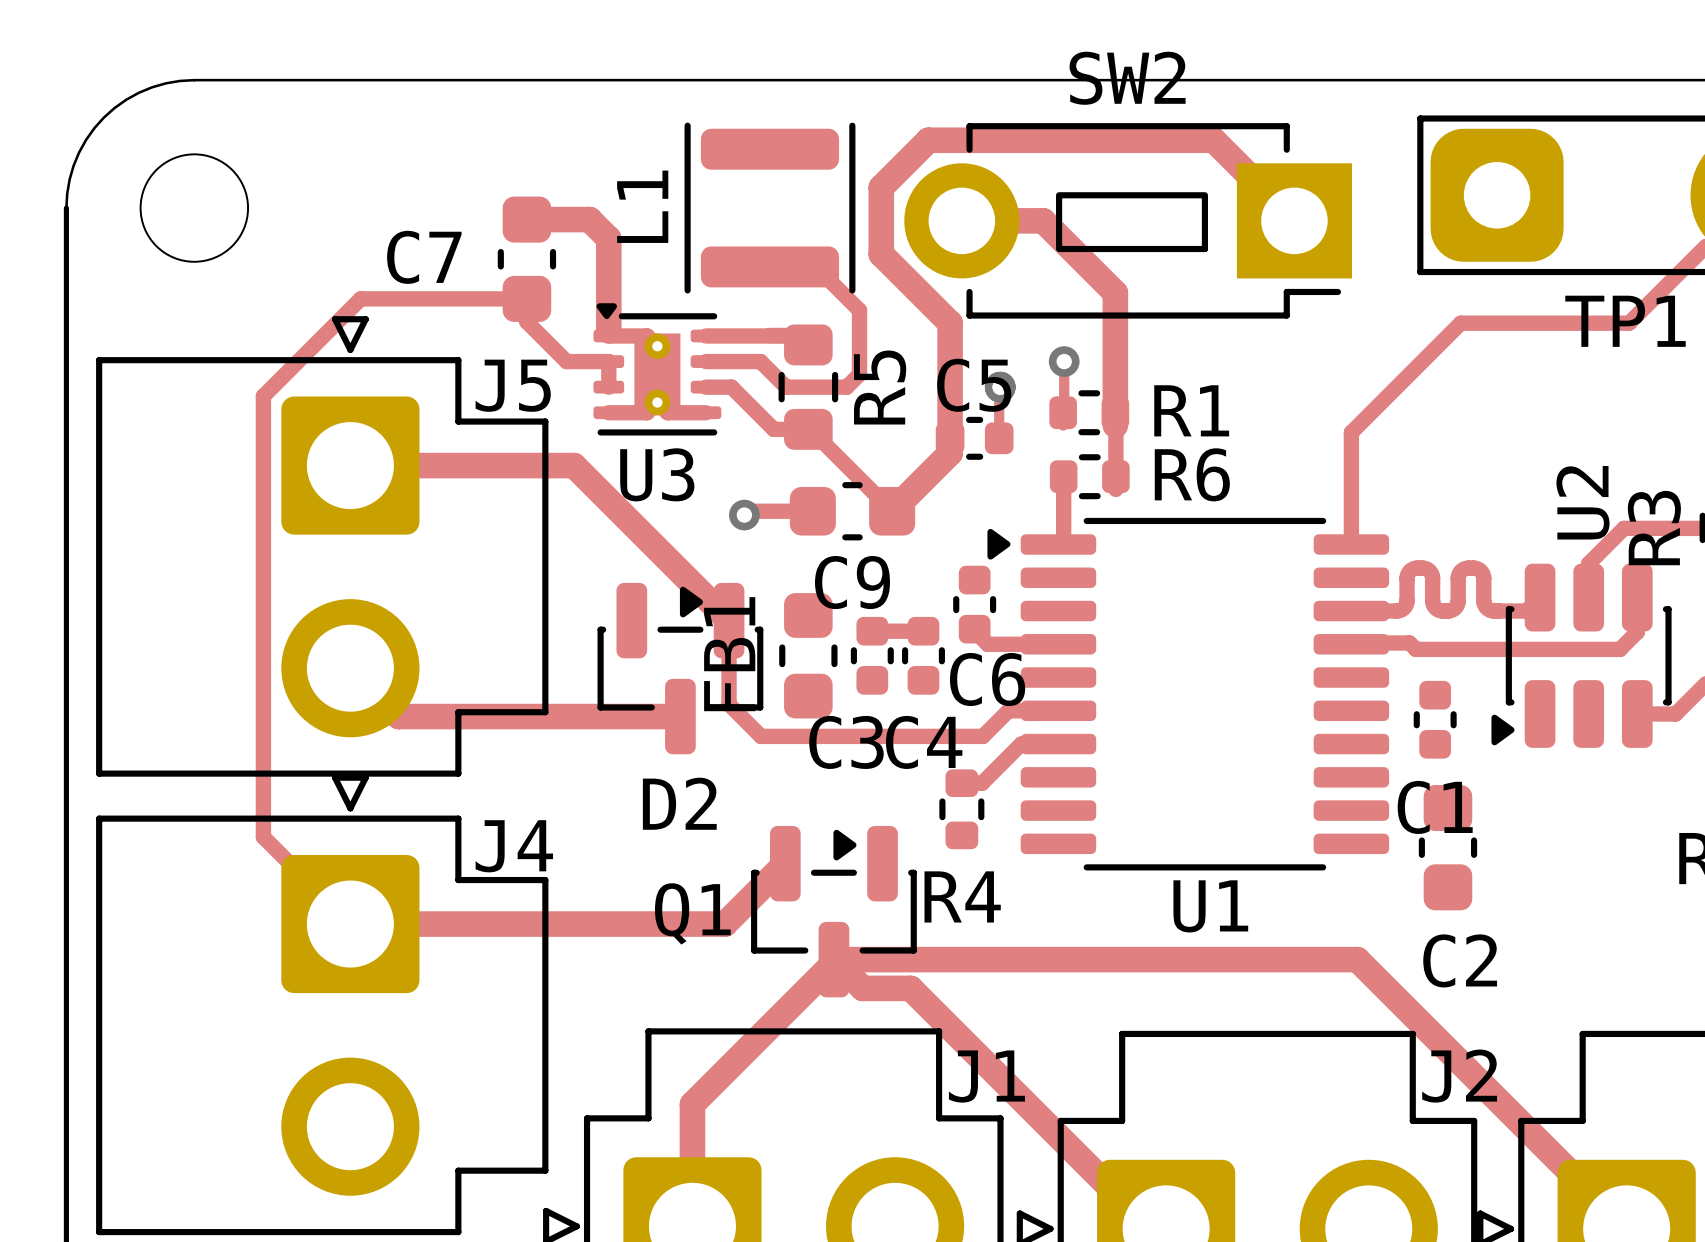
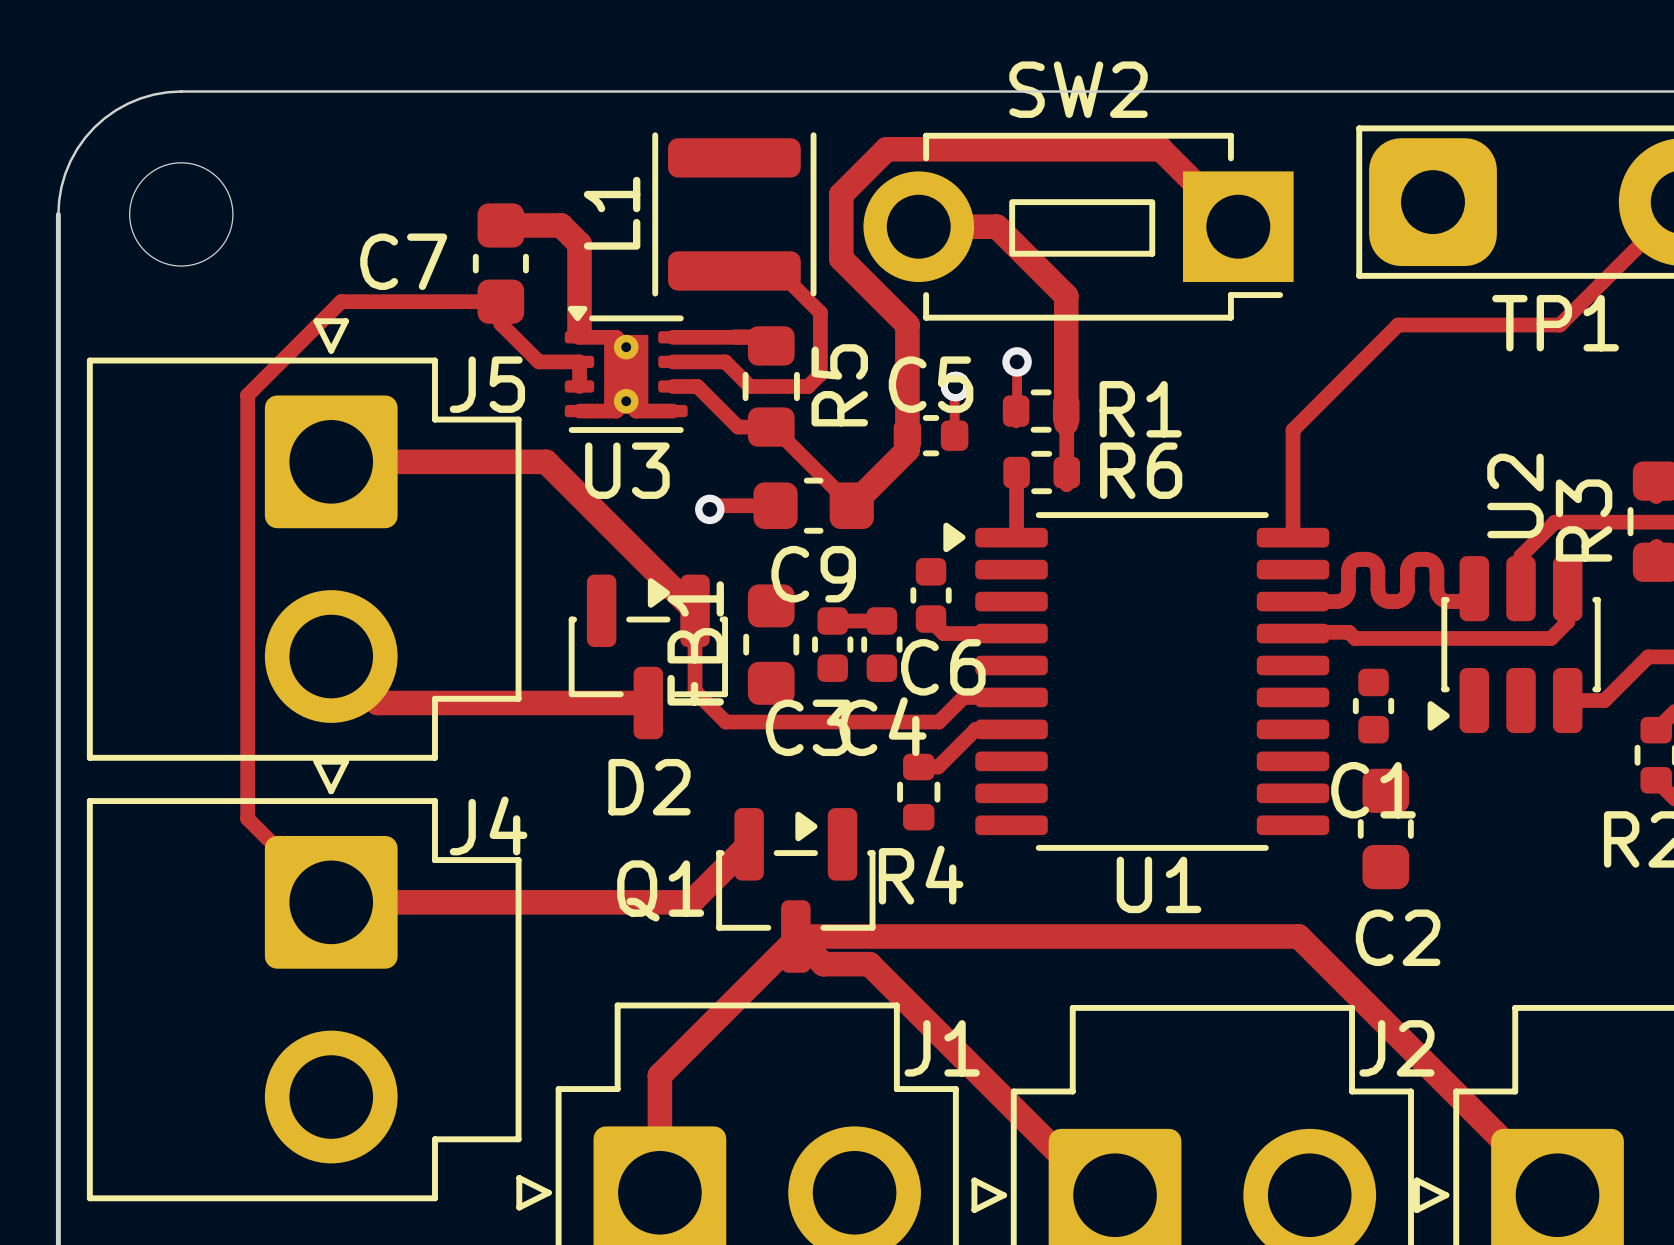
track: (1396, 611) (1403, 608) (1406, 603) (1407, 574) (1412, 569) (1417, 568) (1426, 568) (1431, 574) (1432, 602) (1434, 607) (1441, 610) (1453, 609) (1458, 602) (1458, 574) (1463, 569) (1468, 568) (1477, 568) (1483, 574) (1483, 602) (1486, 608) (1492, 610) (1513, 611) -> (1336, 601) (1344, 599) (1347, 593) (1350, 564) (1360, 559) (1370, 559) (1376, 565) (1378, 591) (1381, 598) (1388, 601) (1400, 600) (1407, 592) (1408, 565) (1412, 561) (1419, 559) (1429, 559) (1435, 564) (1437, 593) (1442, 599) (1448, 601)

